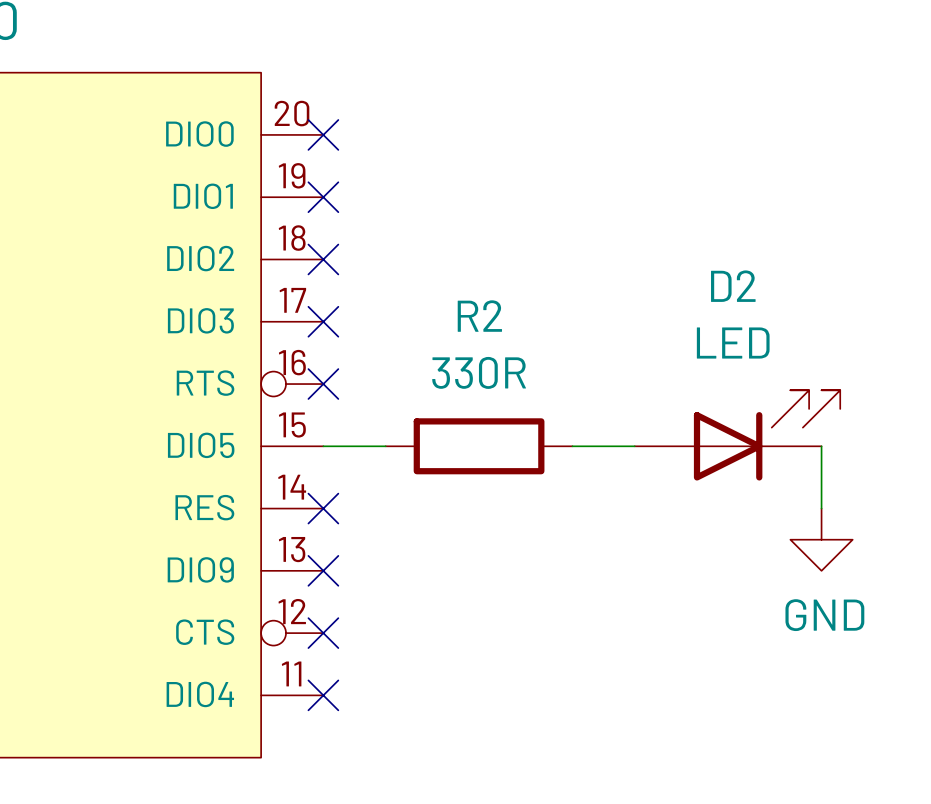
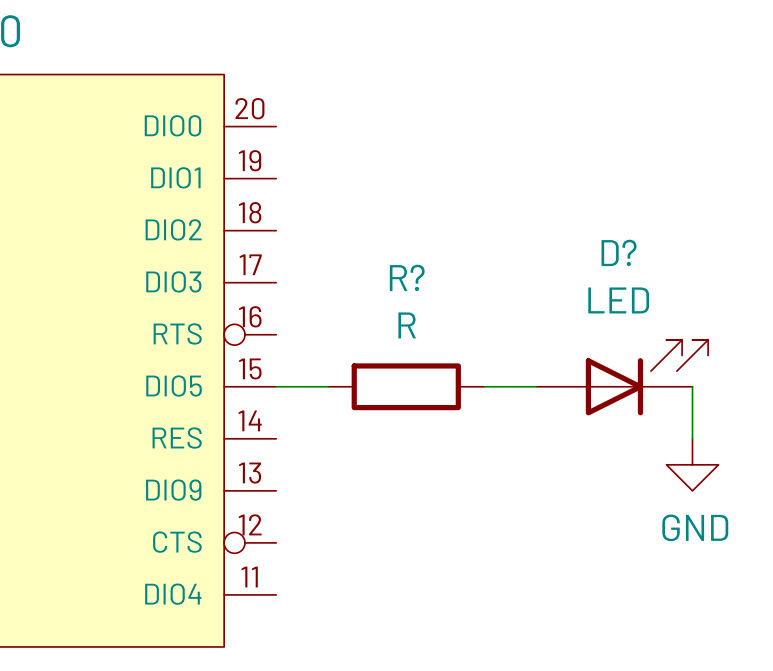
no-connect mark: (323, 134) -> none
no-connect mark: (323, 197) -> none
no-connect mark: (323, 259) -> none
D2 name: D2 (733, 286) -> D? (619, 252)
R2 name: R2 (479, 316) -> R? (407, 277)
no-connect mark: (323, 321) -> none
R2 value: 330R (479, 372) -> R (407, 325)
no-connect mark: (323, 384) -> none
no-connect mark: (323, 508) -> none
no-connect mark: (323, 570) -> none
no-connect mark: (323, 633) -> none
no-connect mark: (323, 695) -> none

